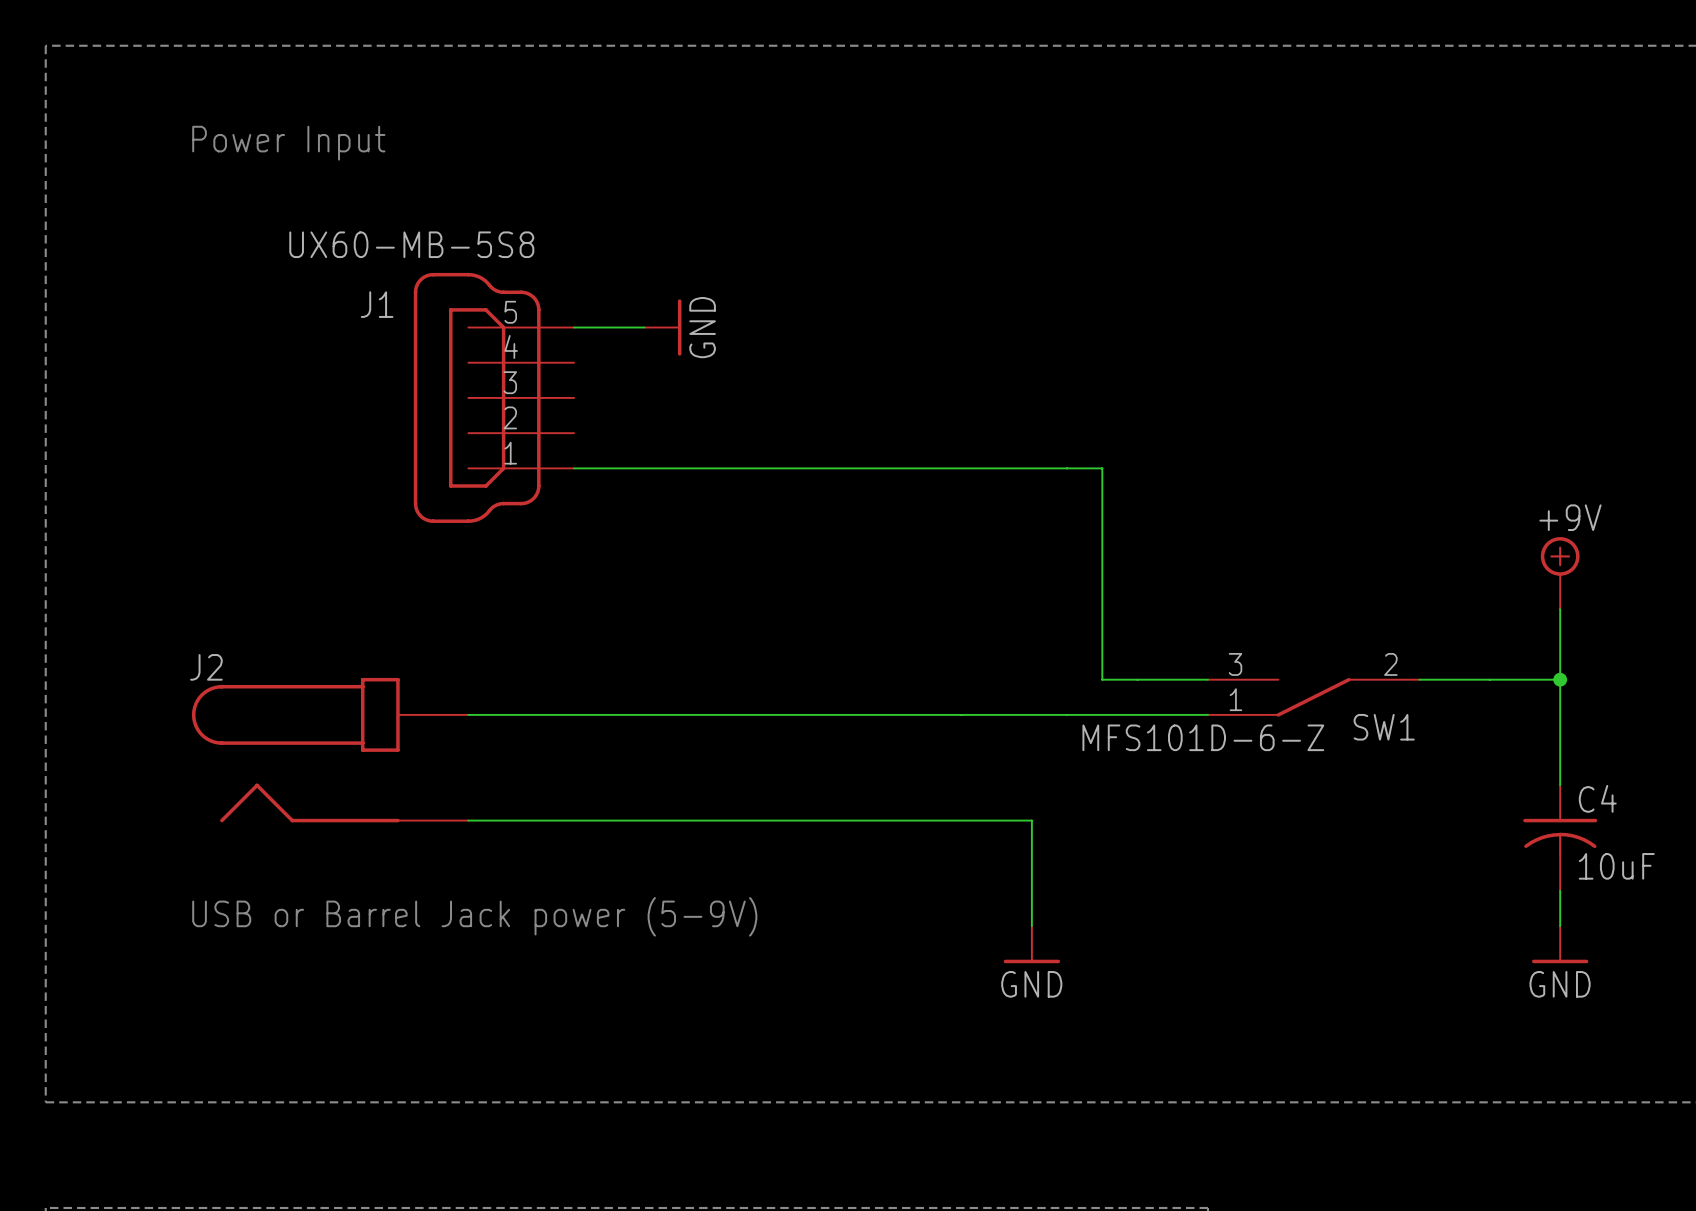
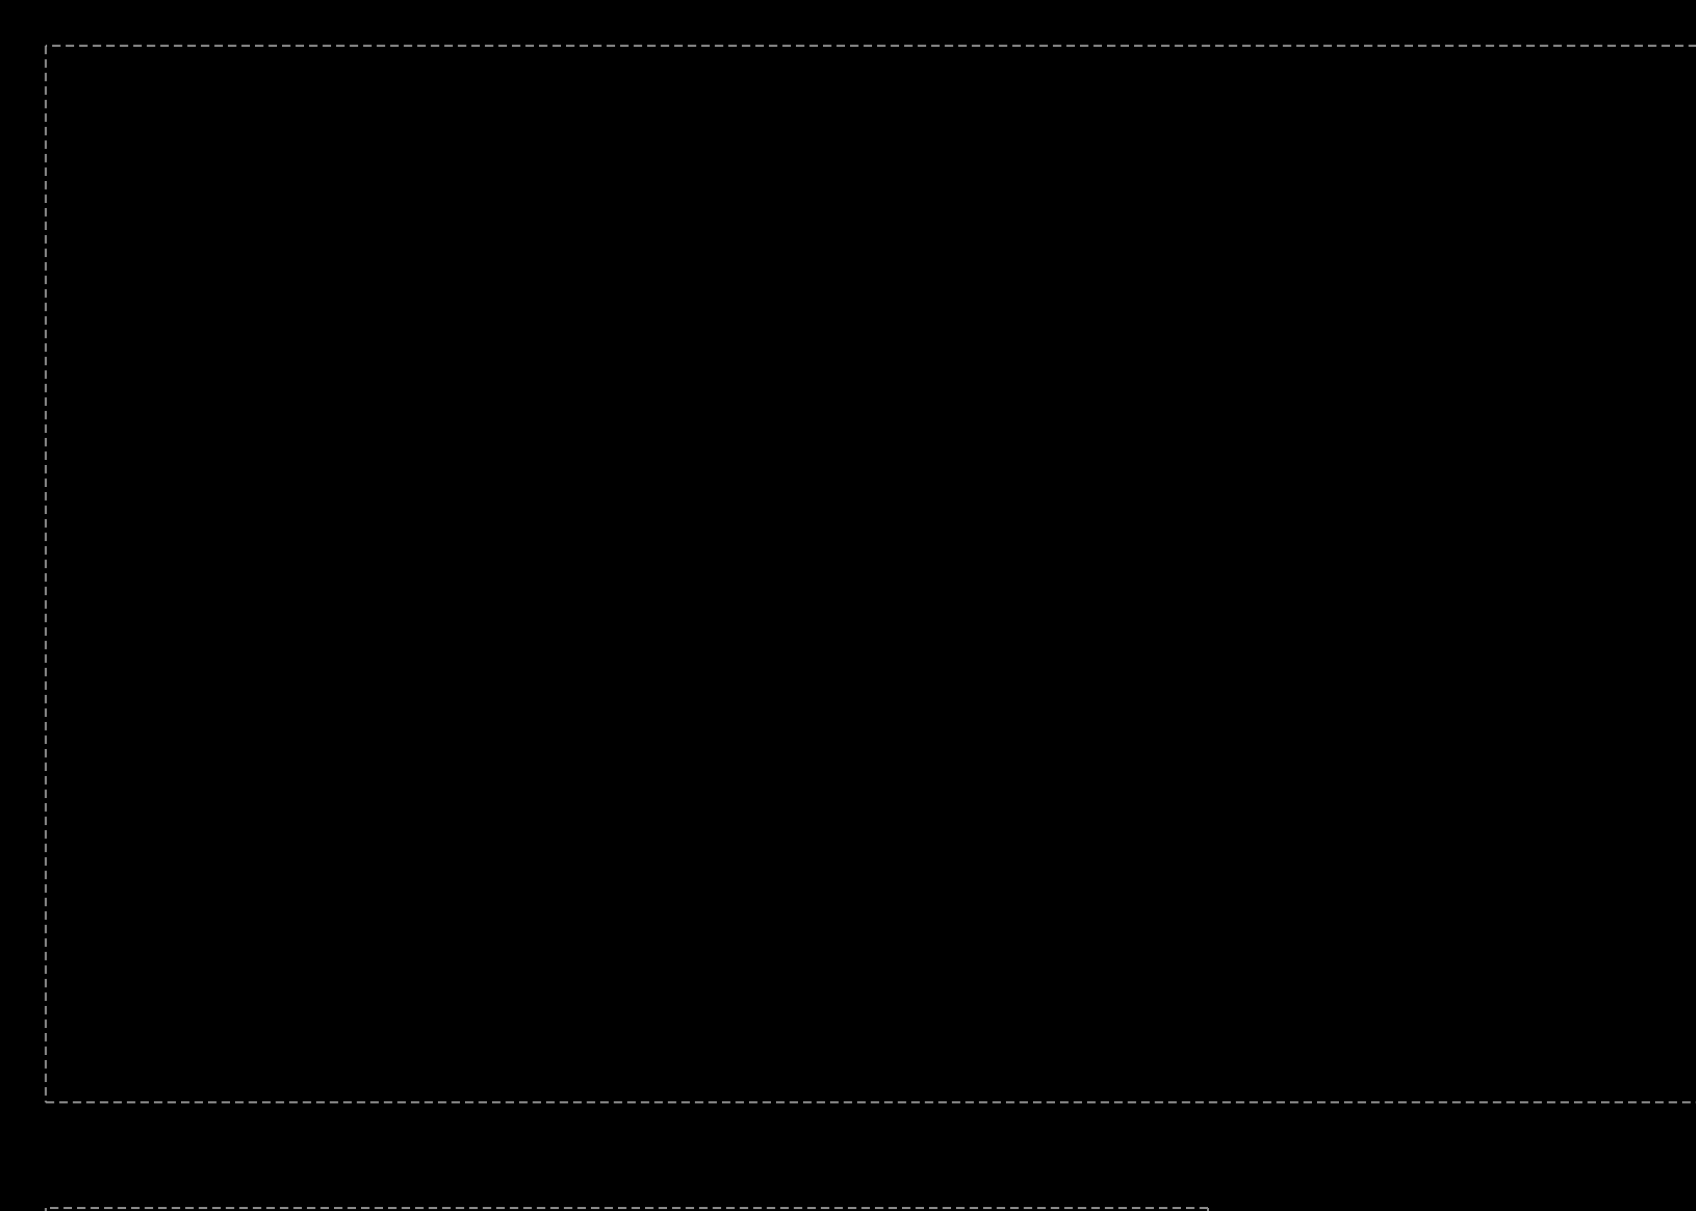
text: Power Input (288, 143) -> none
wire: (574, 327) (644, 327) -> none
power symbol: GND (662, 327) -> none
J1: UX60-MB-5S8 (493, 397) -> none
wire: (574, 468) (1102, 468) (1102, 679) (1207, 679) -> none
power symbol: +9V (1560, 573) -> none
wire: (1560, 609) (1560, 785) -> none
wire: (1419, 679) (1560, 679) -> none
junction: (1560, 679) -> none
SW1: MFS101D-6-Z (1313, 697) -> none
wire: (468, 714) (1207, 714) -> none
J2: (330, 750) -> none
wire: (468, 820) (1031, 820) (1031, 926) -> none
C4: 10uF (1560, 838) -> none
wire: (1560, 891) (1560, 926) -> none
text: USB or Barrel Jack power (5-9V) (474, 916) -> none
power symbol: GND (1031, 944) -> none
power symbol: GND (1560, 944) -> none

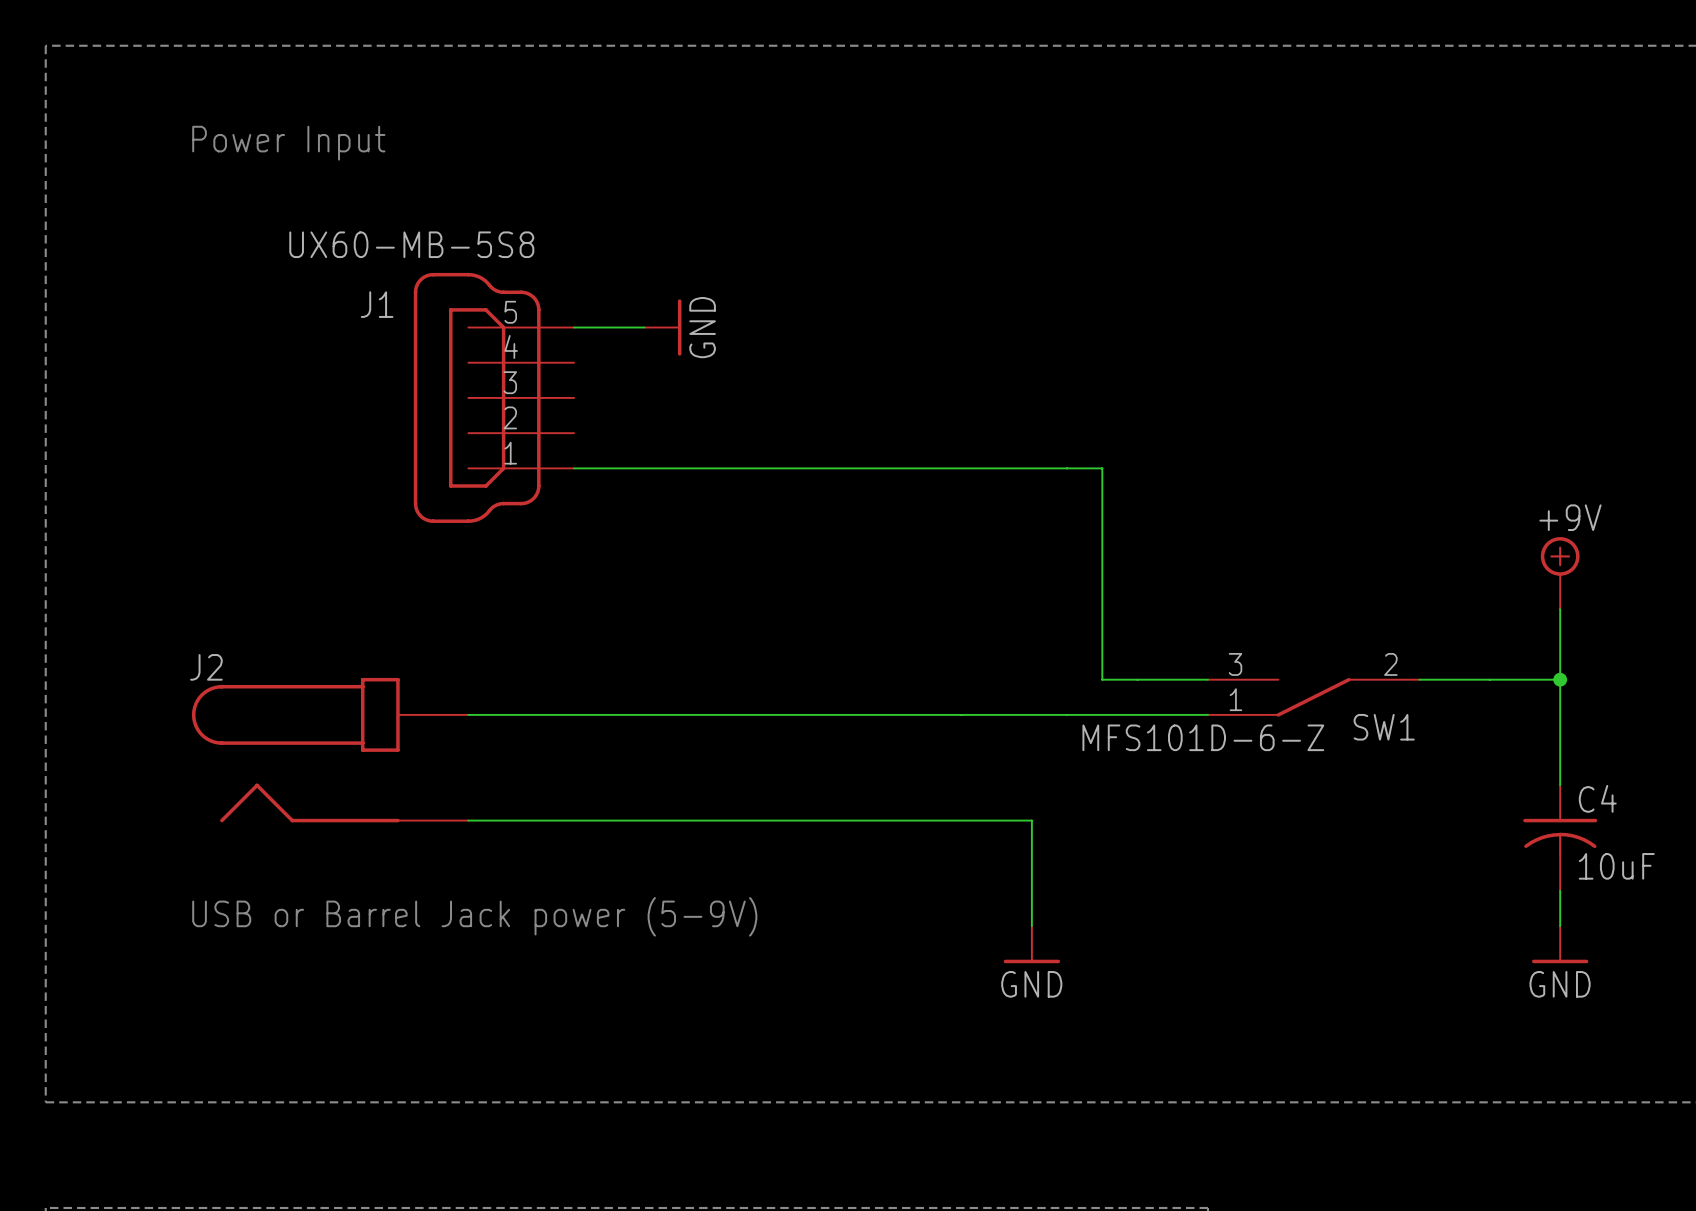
text: none -> Power Input (288, 143)
wire: none -> (574, 327) (644, 327)
power symbol: none -> GND (662, 327)
J1: none -> UX60-MB-5S8 (493, 397)
wire: none -> (574, 468) (1102, 468) (1102, 679) (1207, 679)
power symbol: none -> +9V (1560, 573)
wire: none -> (1560, 609) (1560, 785)
wire: none -> (1419, 679) (1560, 679)
junction: none -> (1560, 679)
SW1: none -> MFS101D-6-Z (1313, 697)
wire: none -> (468, 714) (1207, 714)
J2: none -> (330, 750)
wire: none -> (468, 820) (1031, 820) (1031, 926)
C4: none -> 10uF (1560, 838)
wire: none -> (1560, 891) (1560, 926)
text: none -> USB or Barrel Jack power (5-9V) (474, 916)
power symbol: none -> GND (1031, 944)
power symbol: none -> GND (1560, 944)

